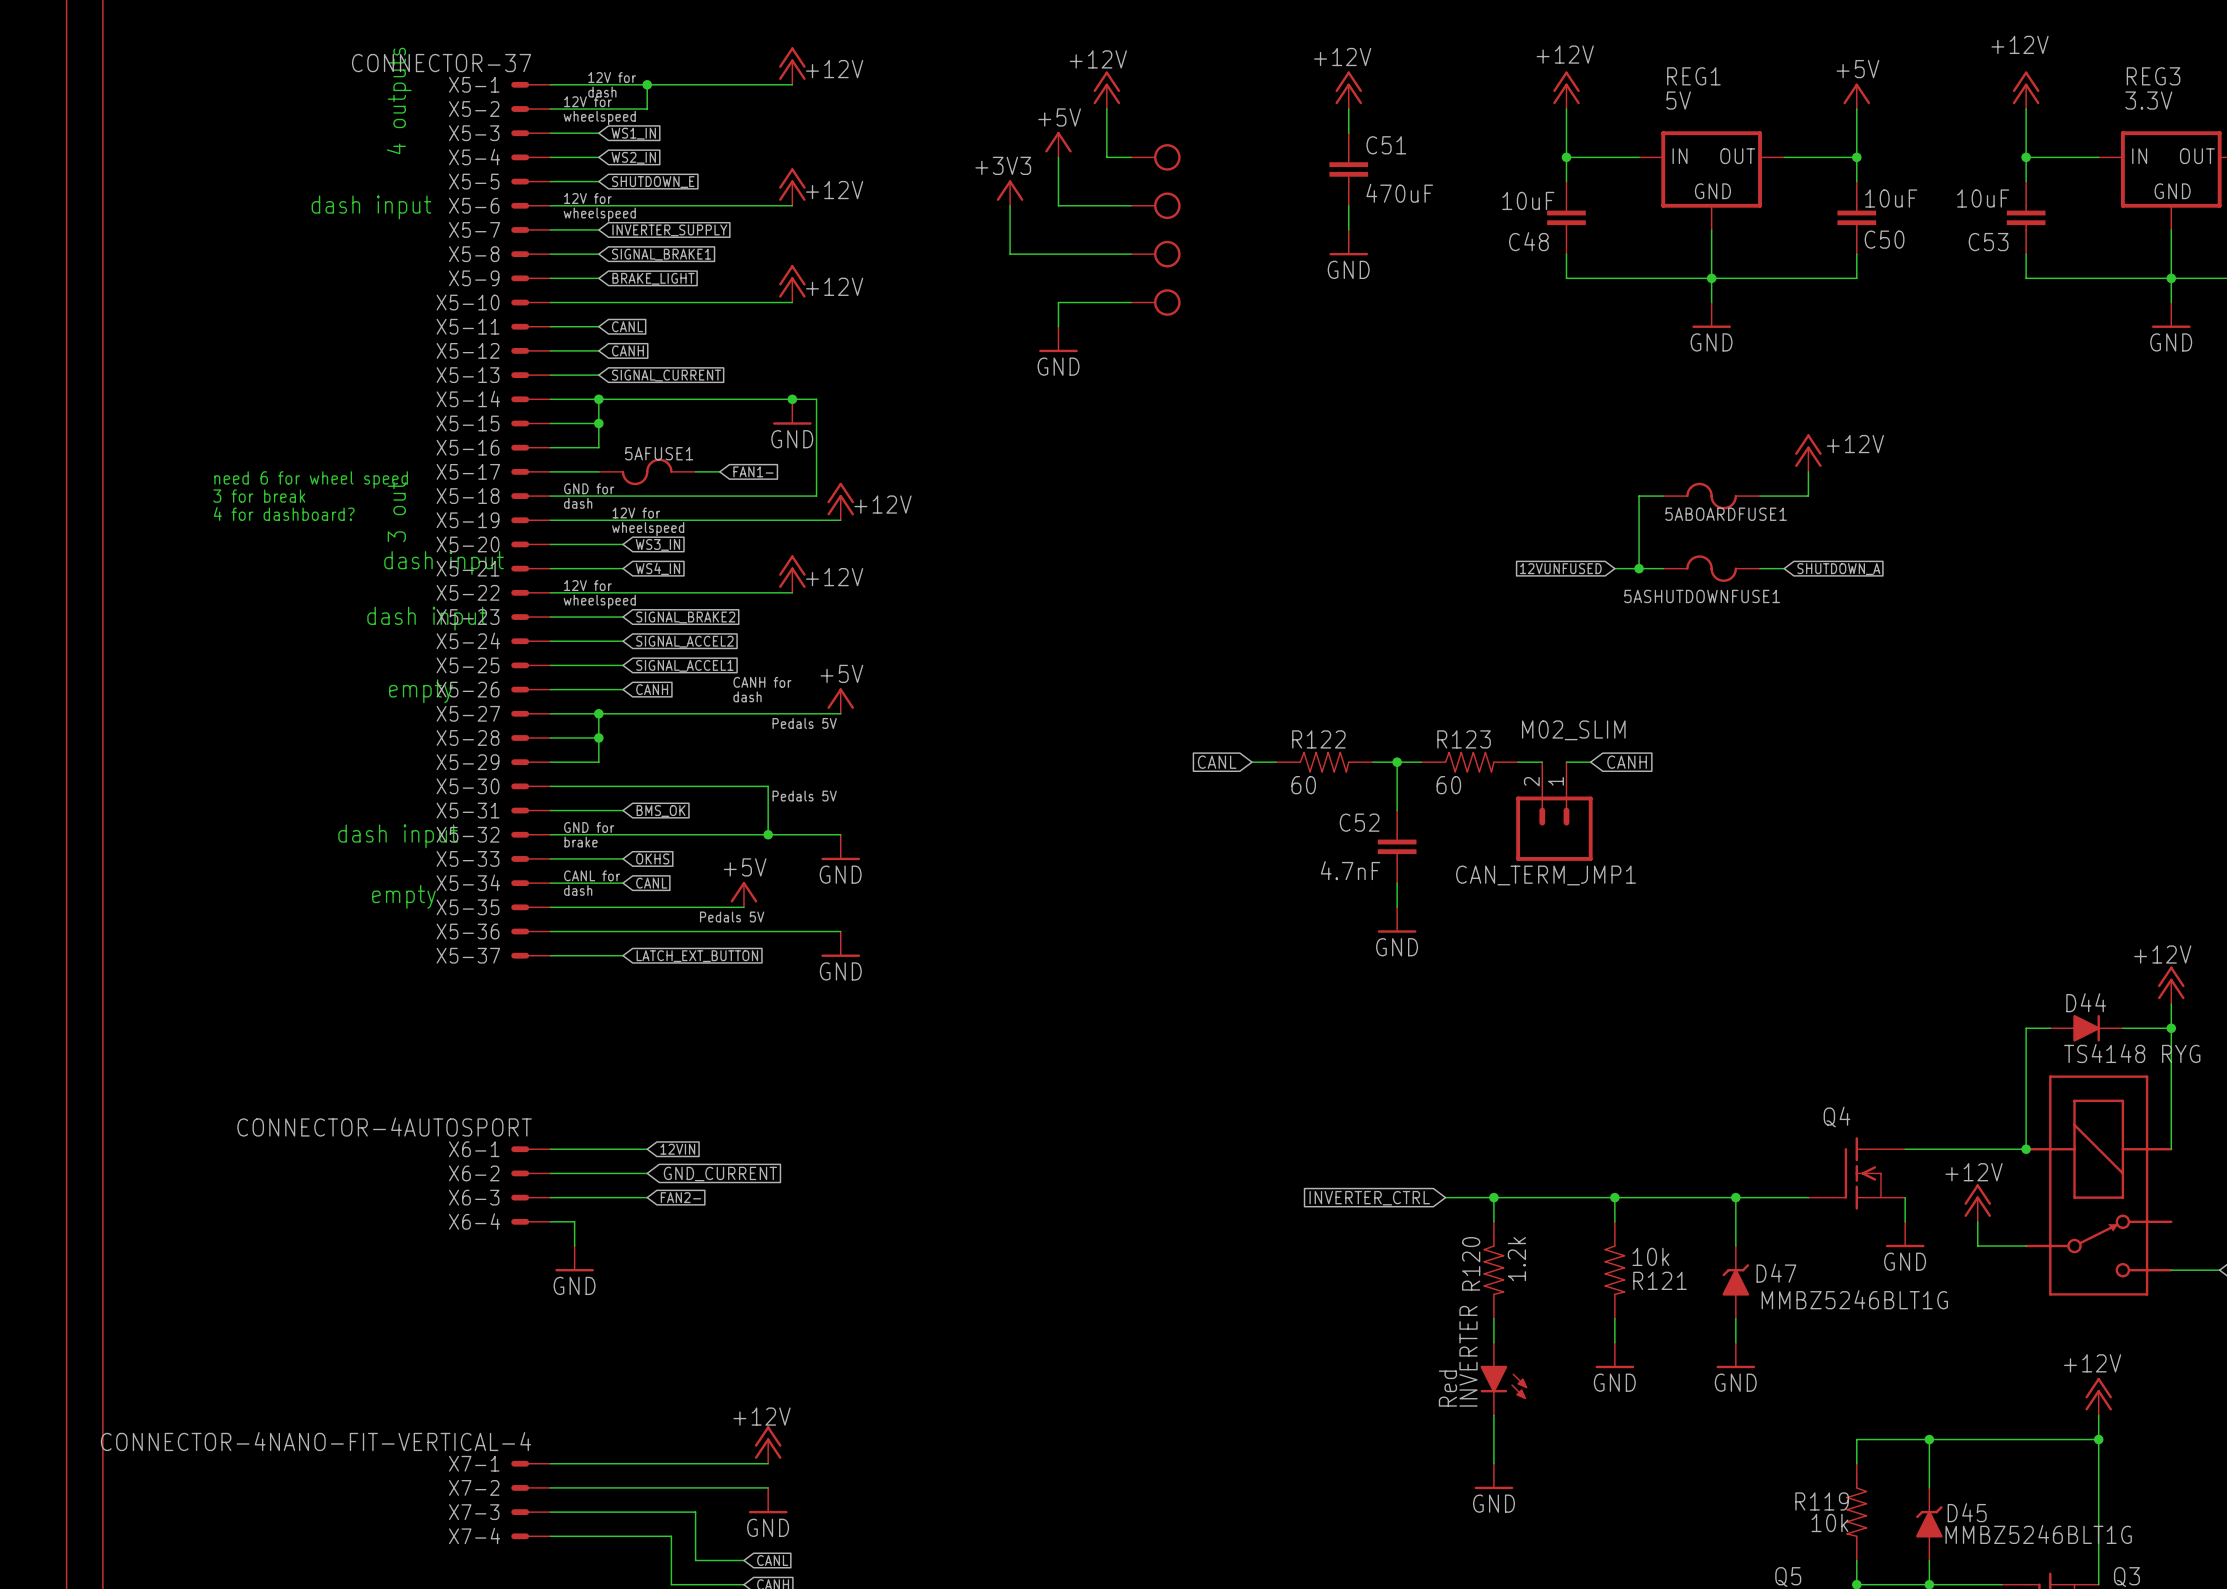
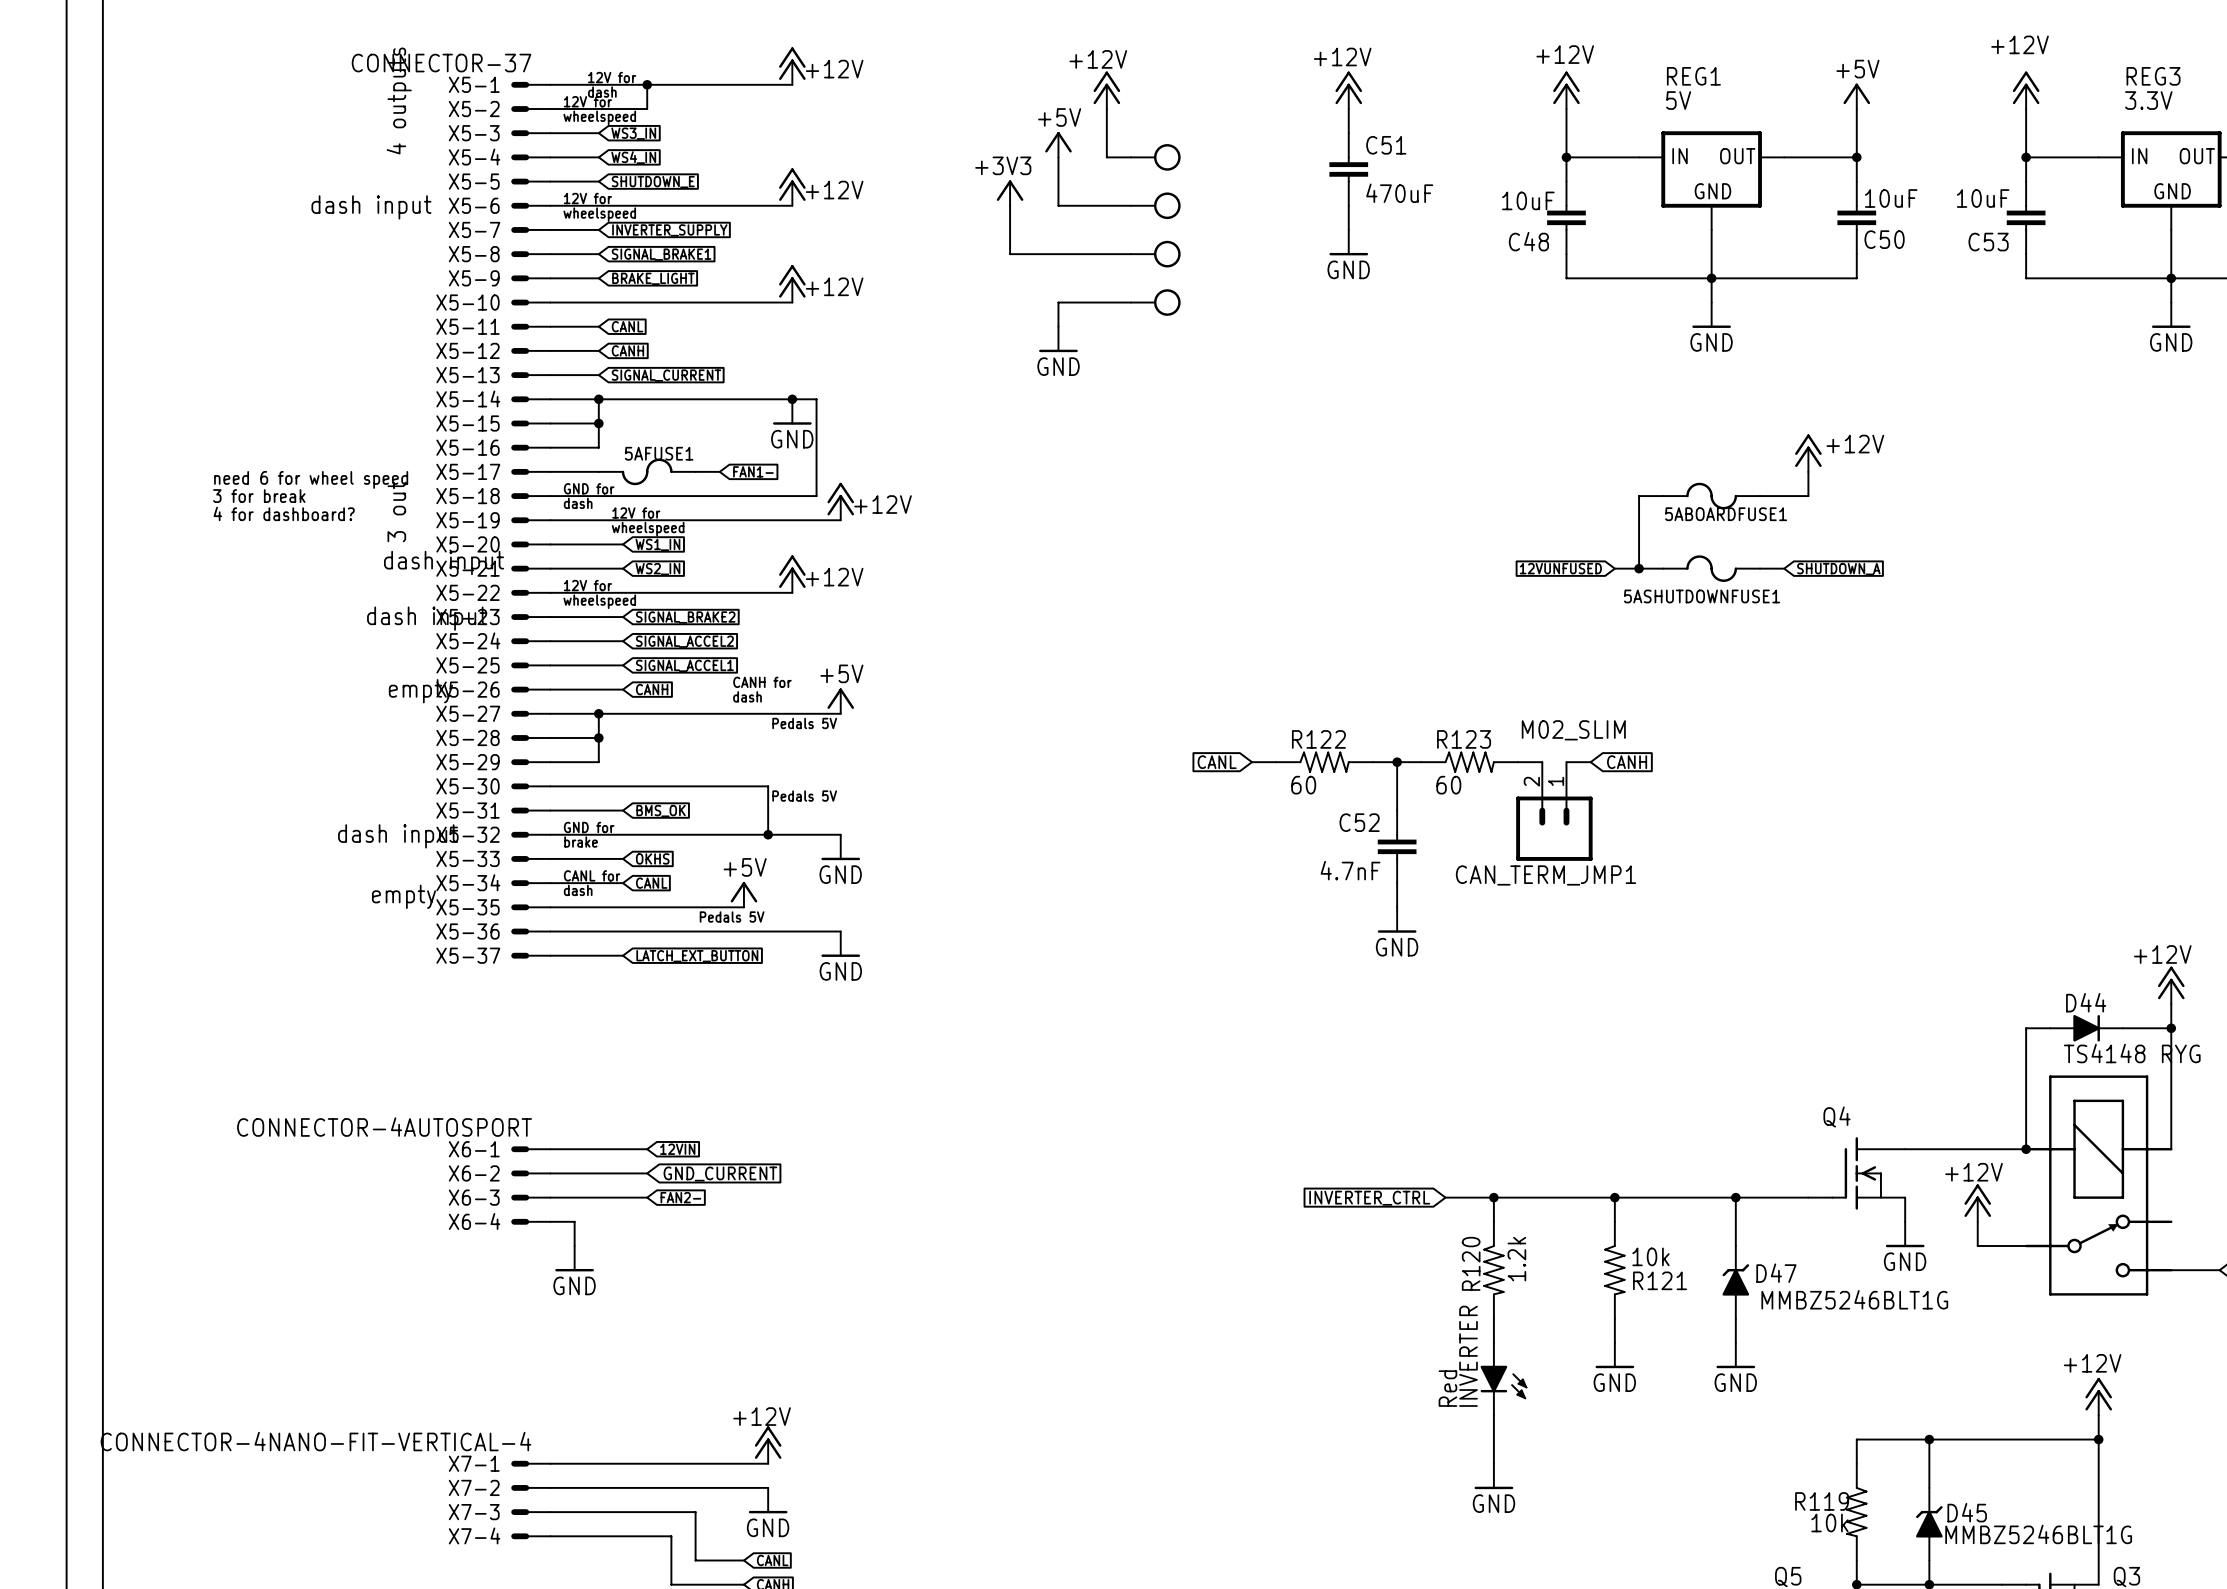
global label: WS1_IN (633, 133) -> WS3_IN (633, 133)
global label: WS2_IN (633, 157) -> WS4_IN (633, 157)
global label: WS3_IN (657, 544) -> WS1_IN (657, 544)
global label: WS4_IN (657, 568) -> WS2_IN (657, 569)

